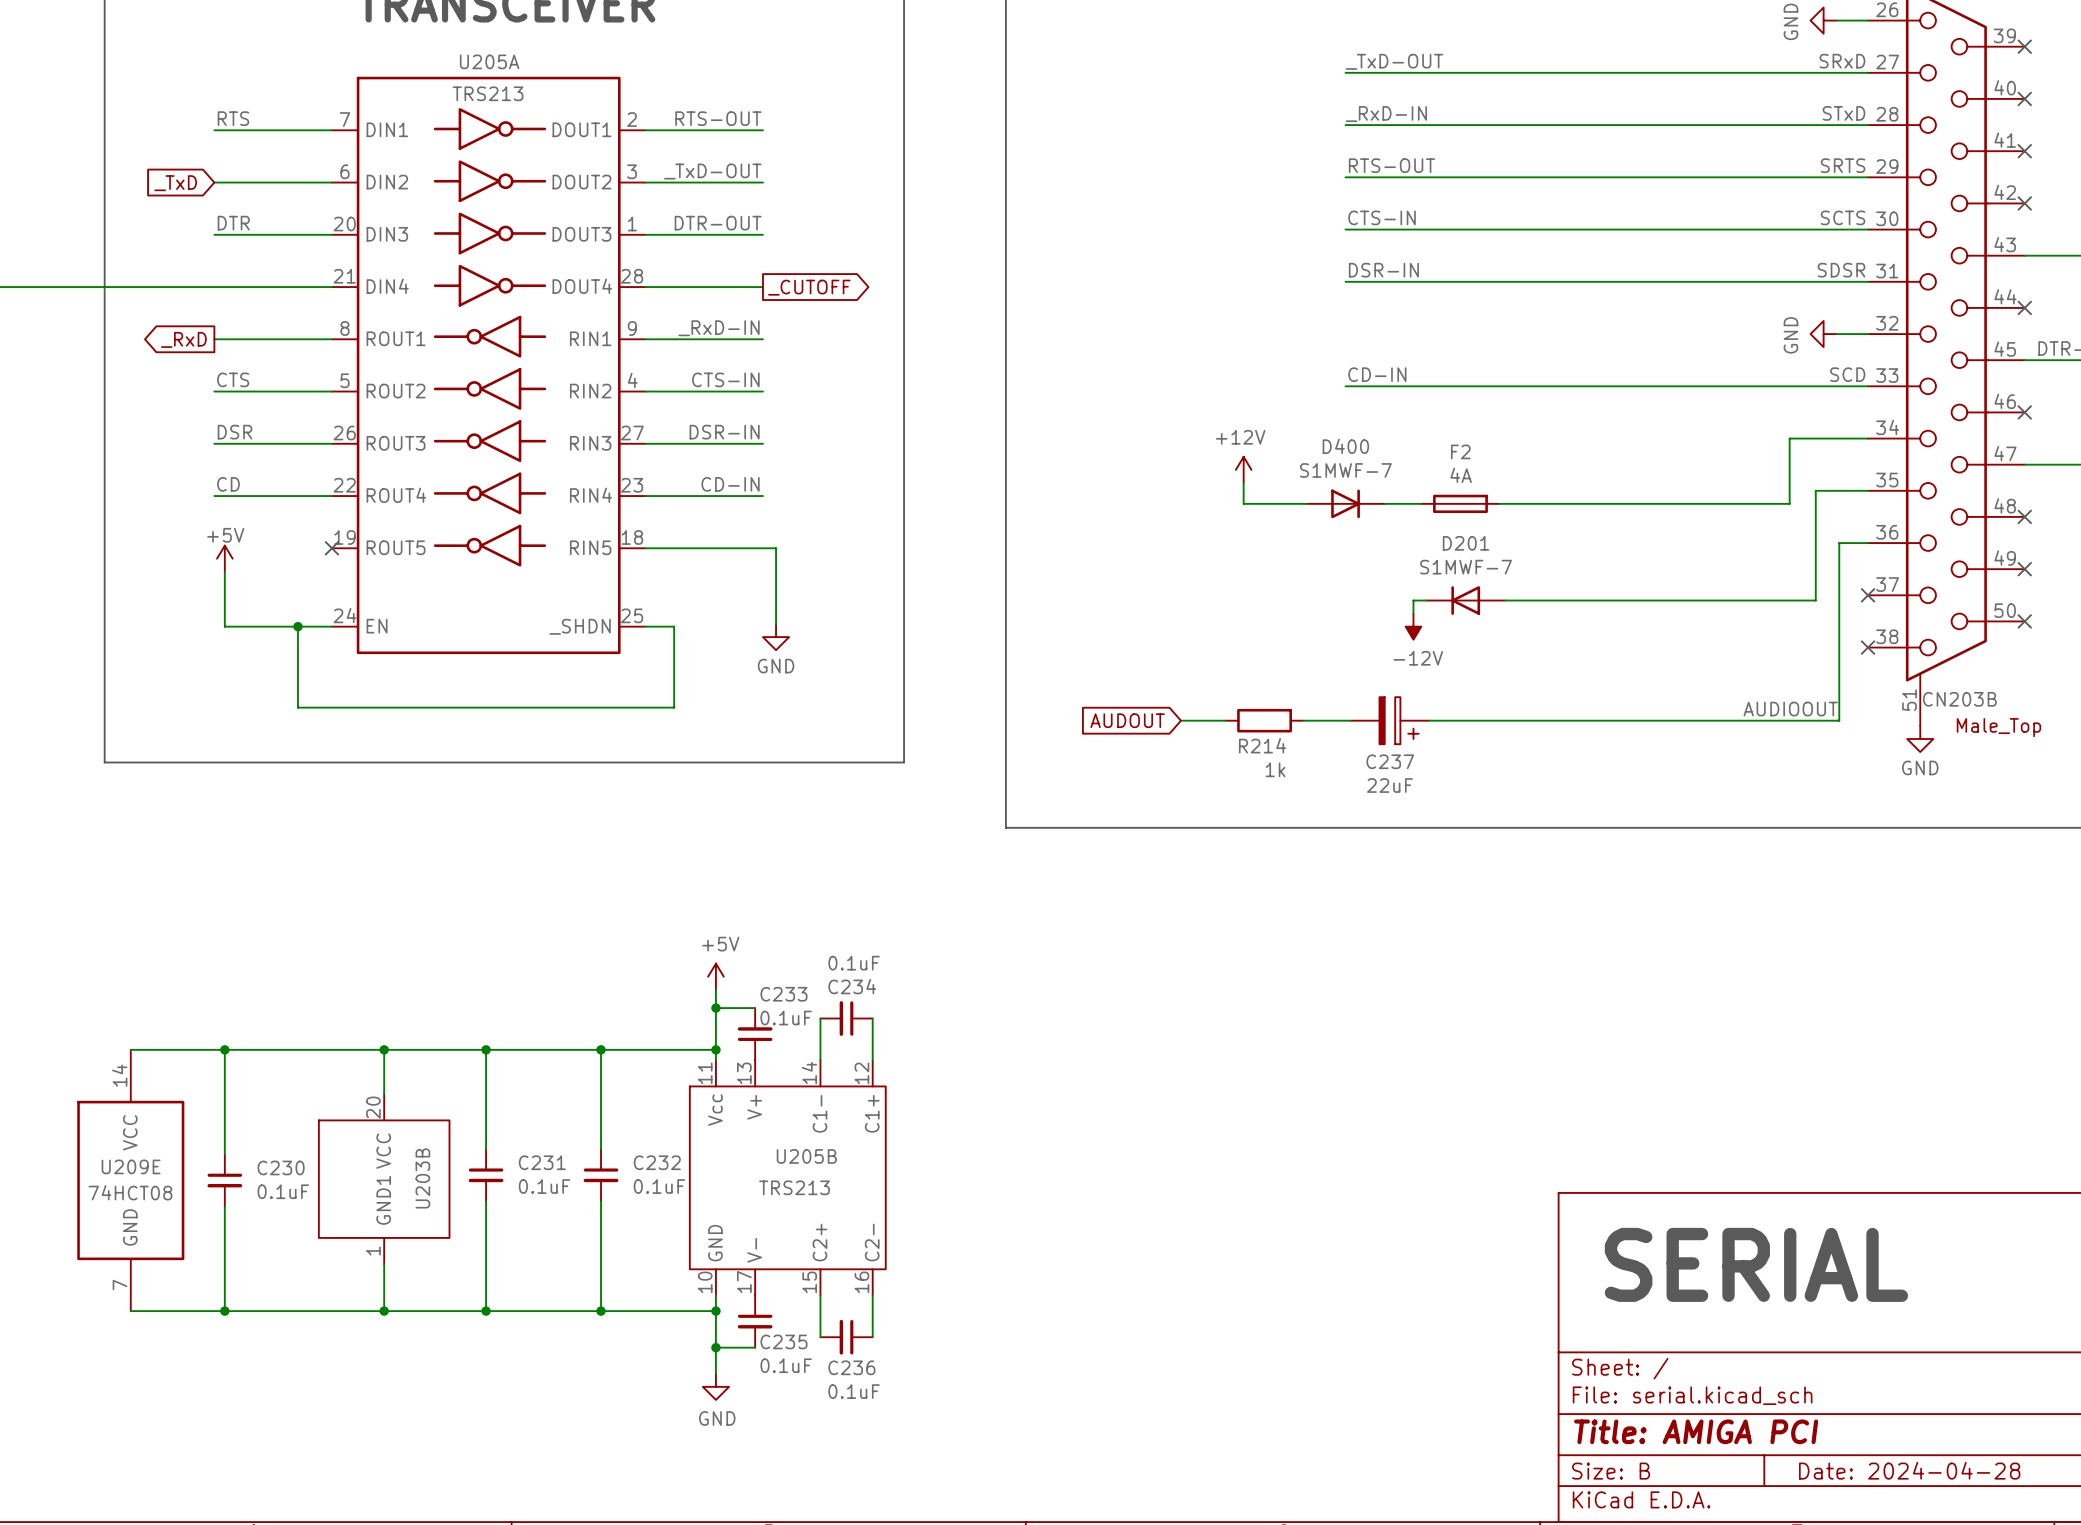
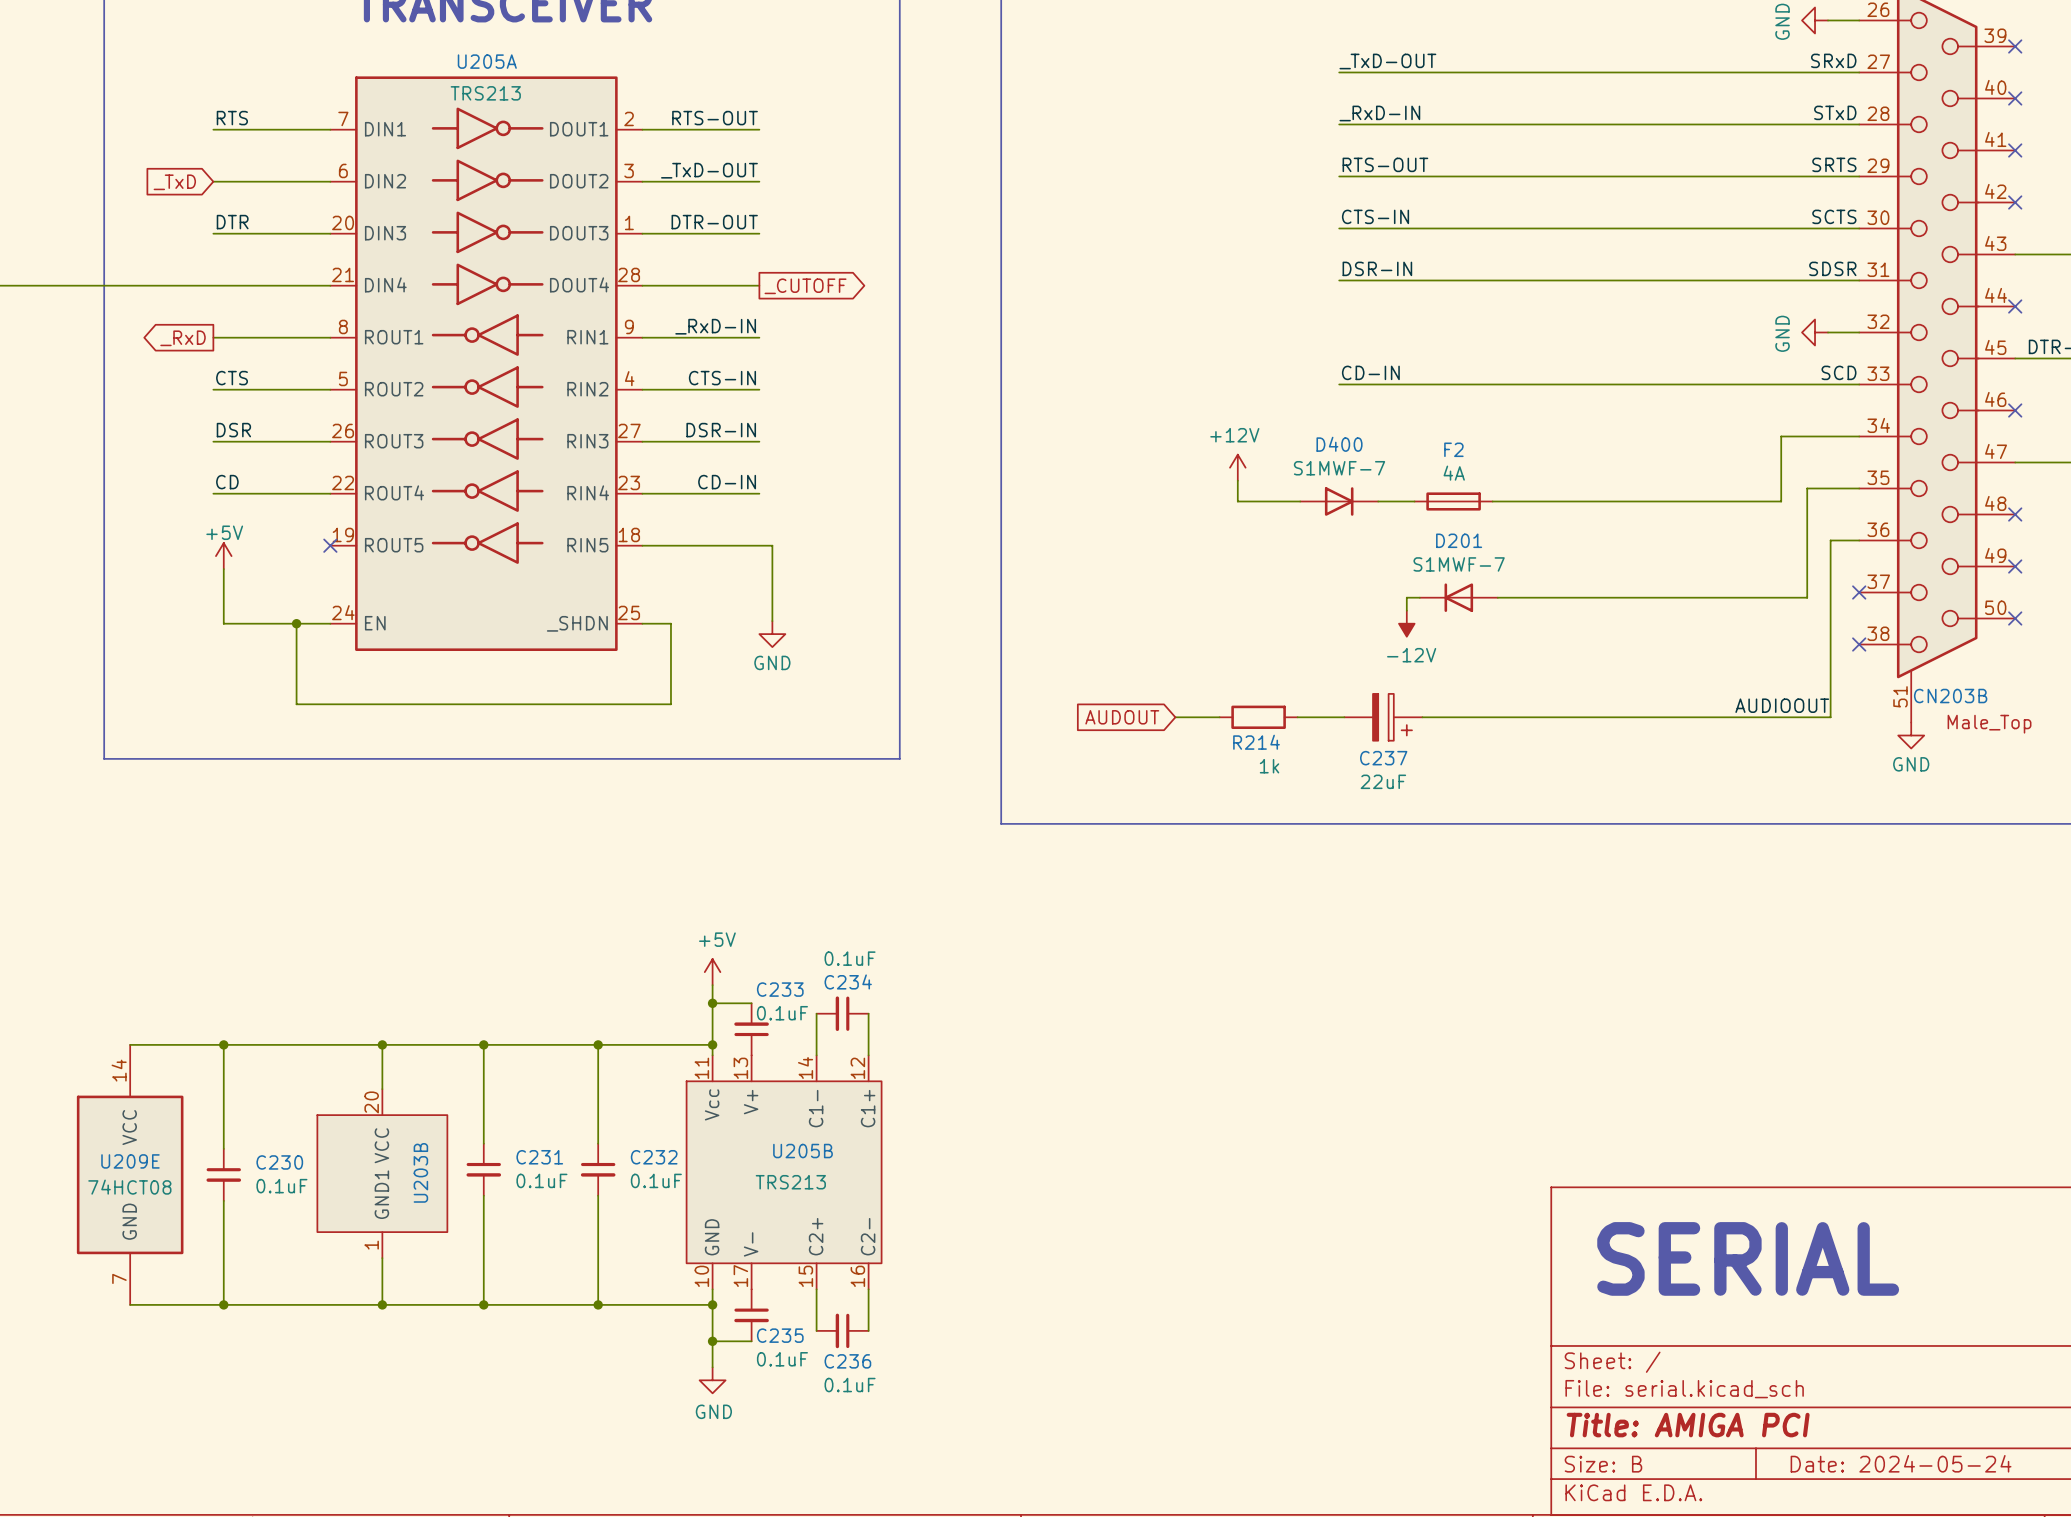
title block: Date: 2024-04-28 (1909, 1470) -> Date: 2024-05-24 (1901, 1463)

